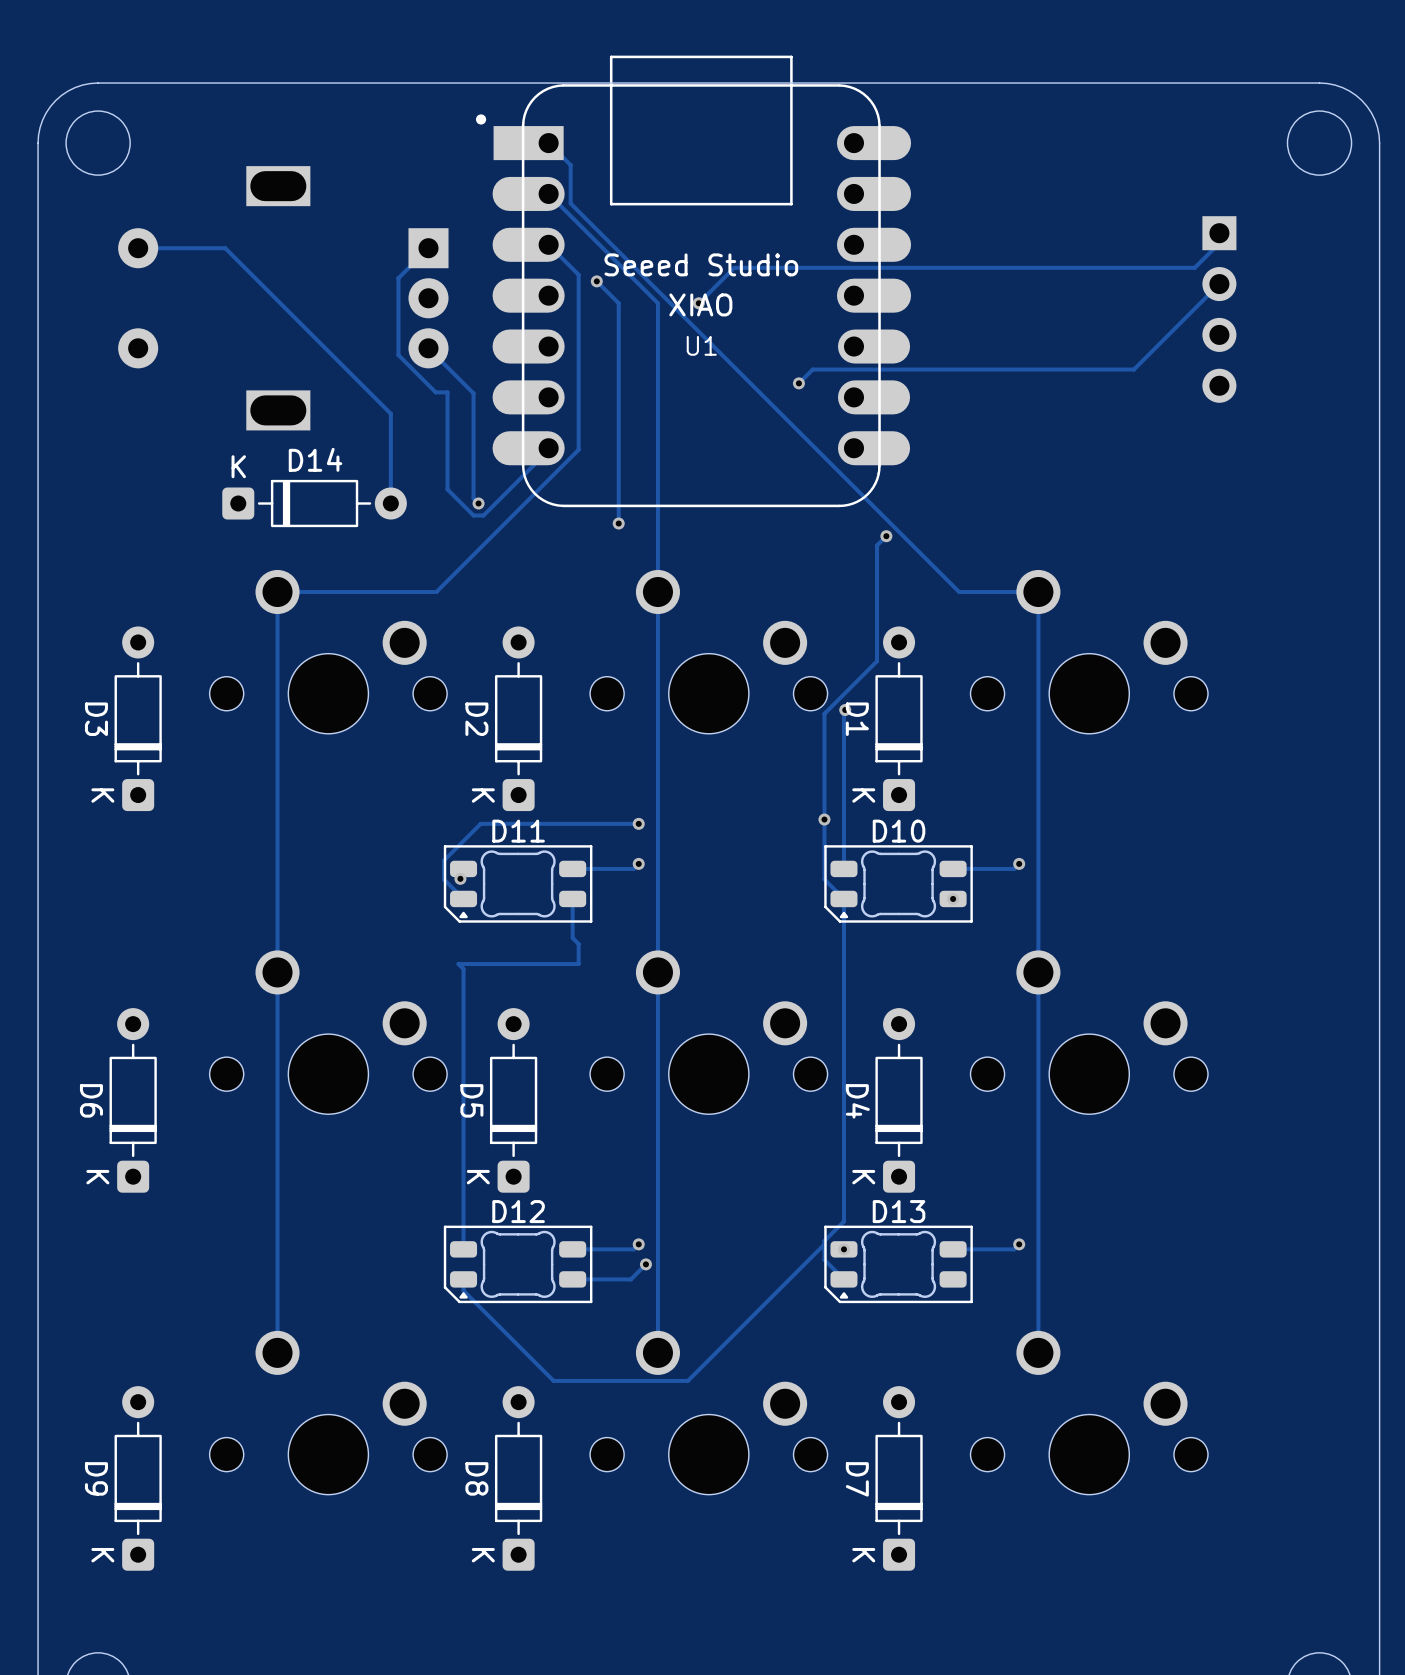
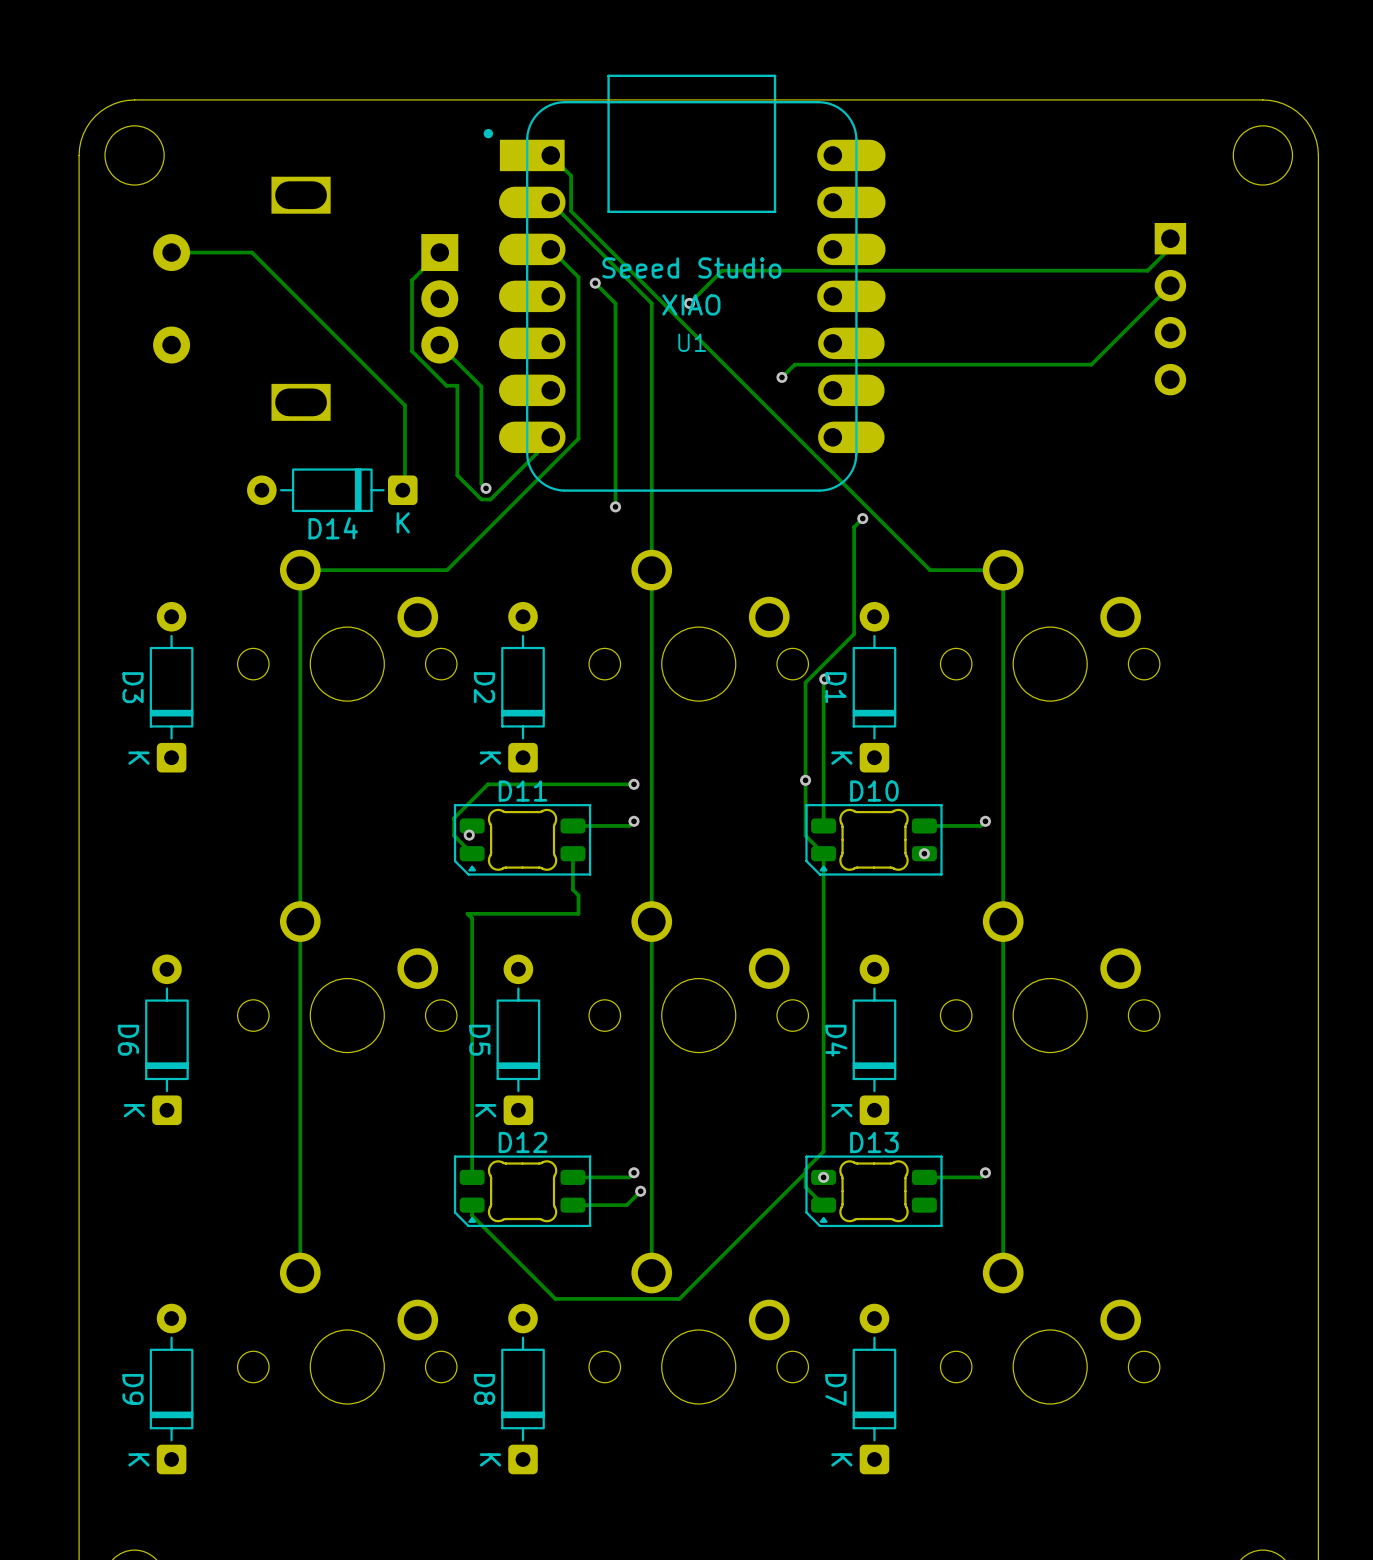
D14 rotation: 0° (314, 503) -> 180° (332, 490)

